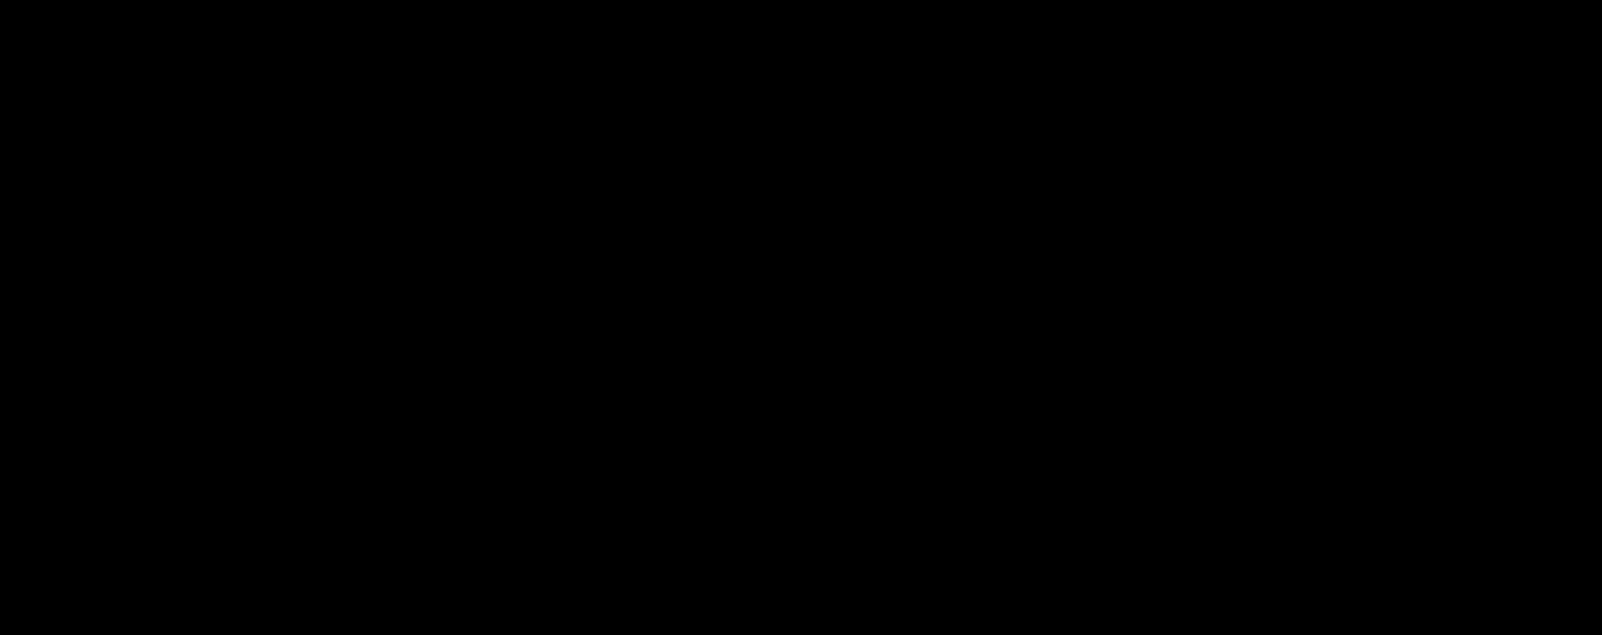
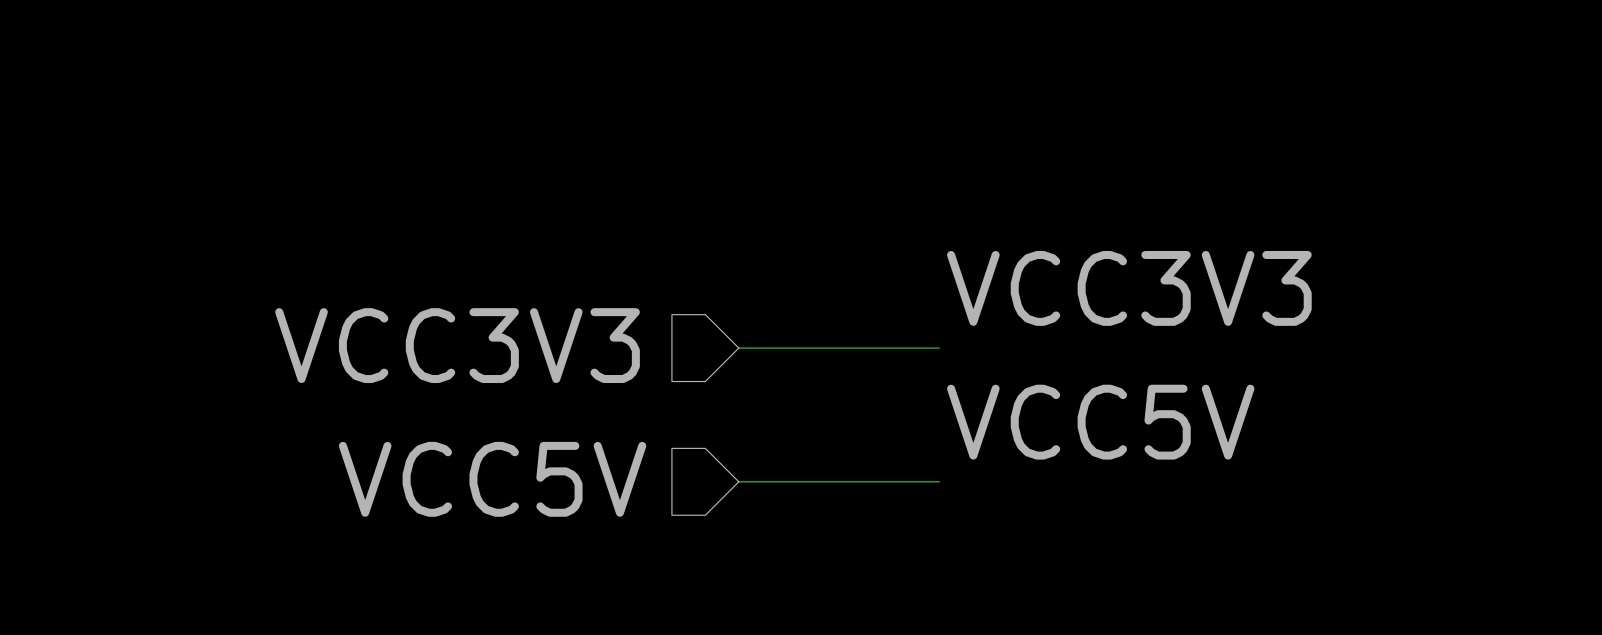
label: none -> VCC3V3 (1129, 288)
hierarchical label: none -> VCC3V3 (457, 345)
wire: none -> (738, 348) (939, 348)
label: none -> VCC5V (1100, 422)
hierarchical label: none -> VCC5V (492, 479)
wire: none -> (738, 481) (939, 481)

